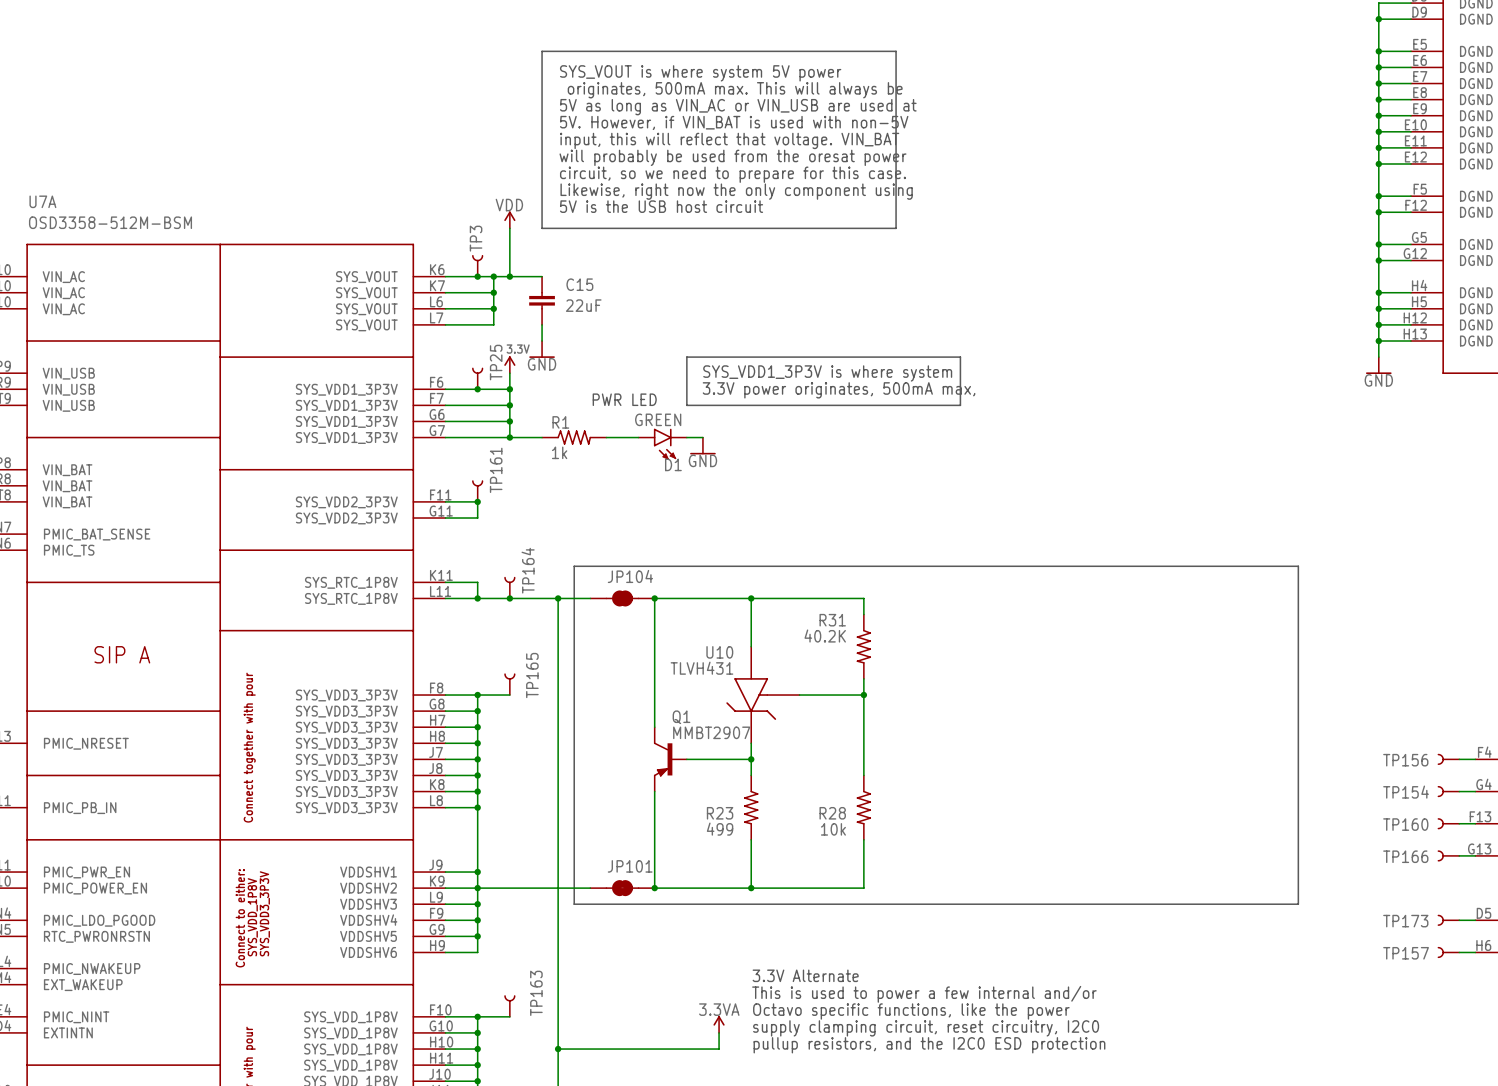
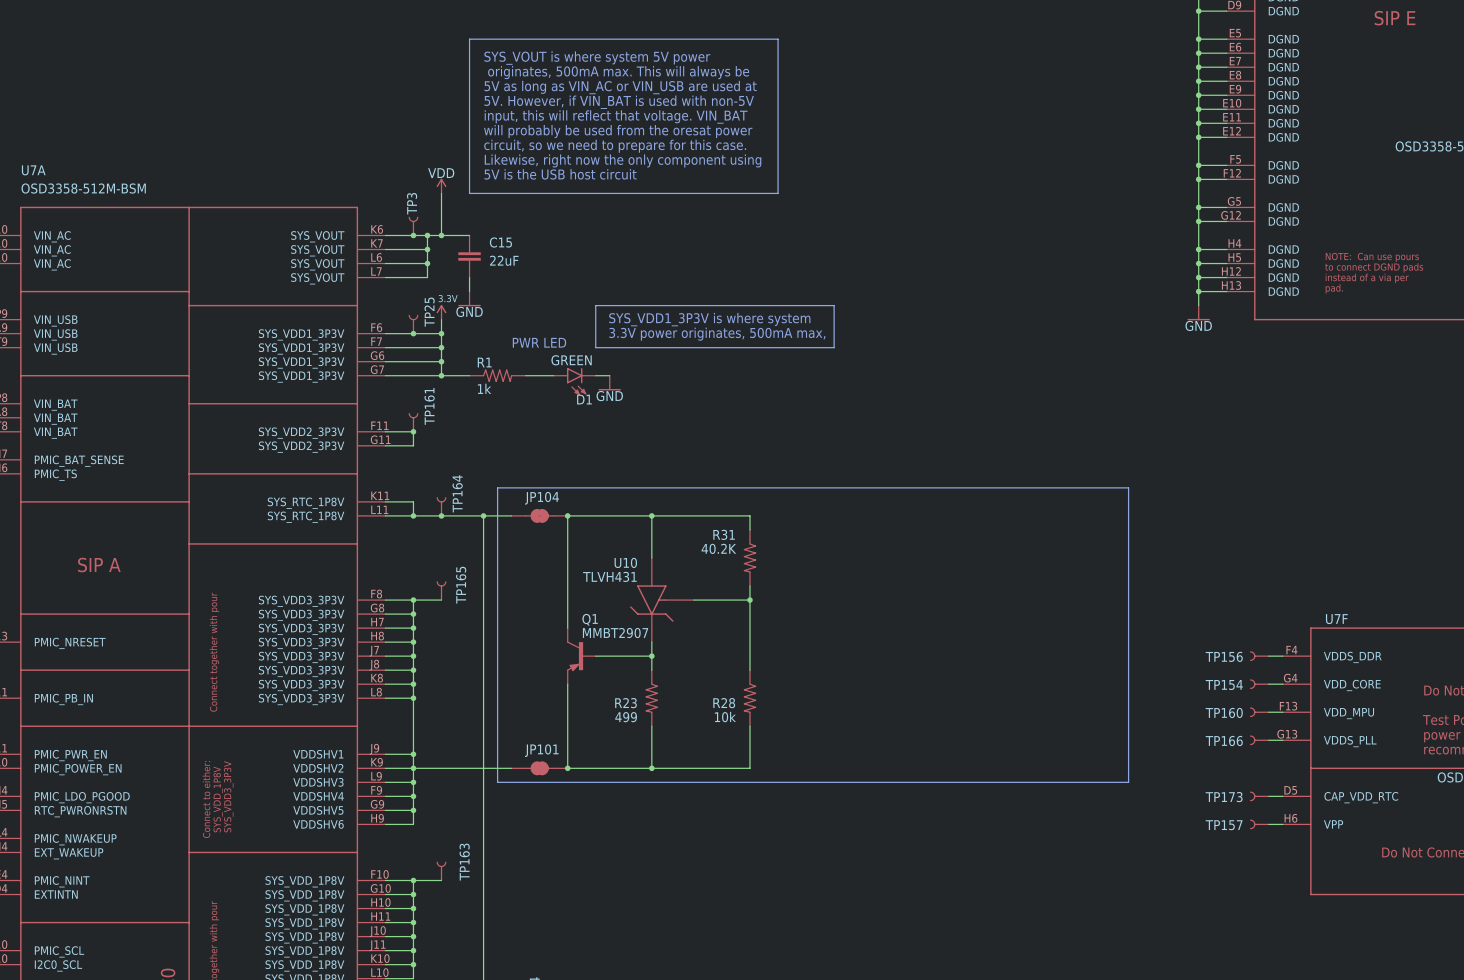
text: 3.3V Alternate (805, 975) -> none
text: This is used to power a few internal and/or (924, 994) -> none
text: Octavo specific functions, like the power (911, 1011) -> none
power symbol: 3.3VA (719, 1024) -> none
text: supply clamping circuit, reset circuitry, I2C0 (926, 1028) -> none
wire: (719, 1032) (719, 1049) (558, 1049) -> none
text: pullup resistors, and the I2C0 ESD protection (929, 1045) -> none
junction: (558, 1049) -> none

